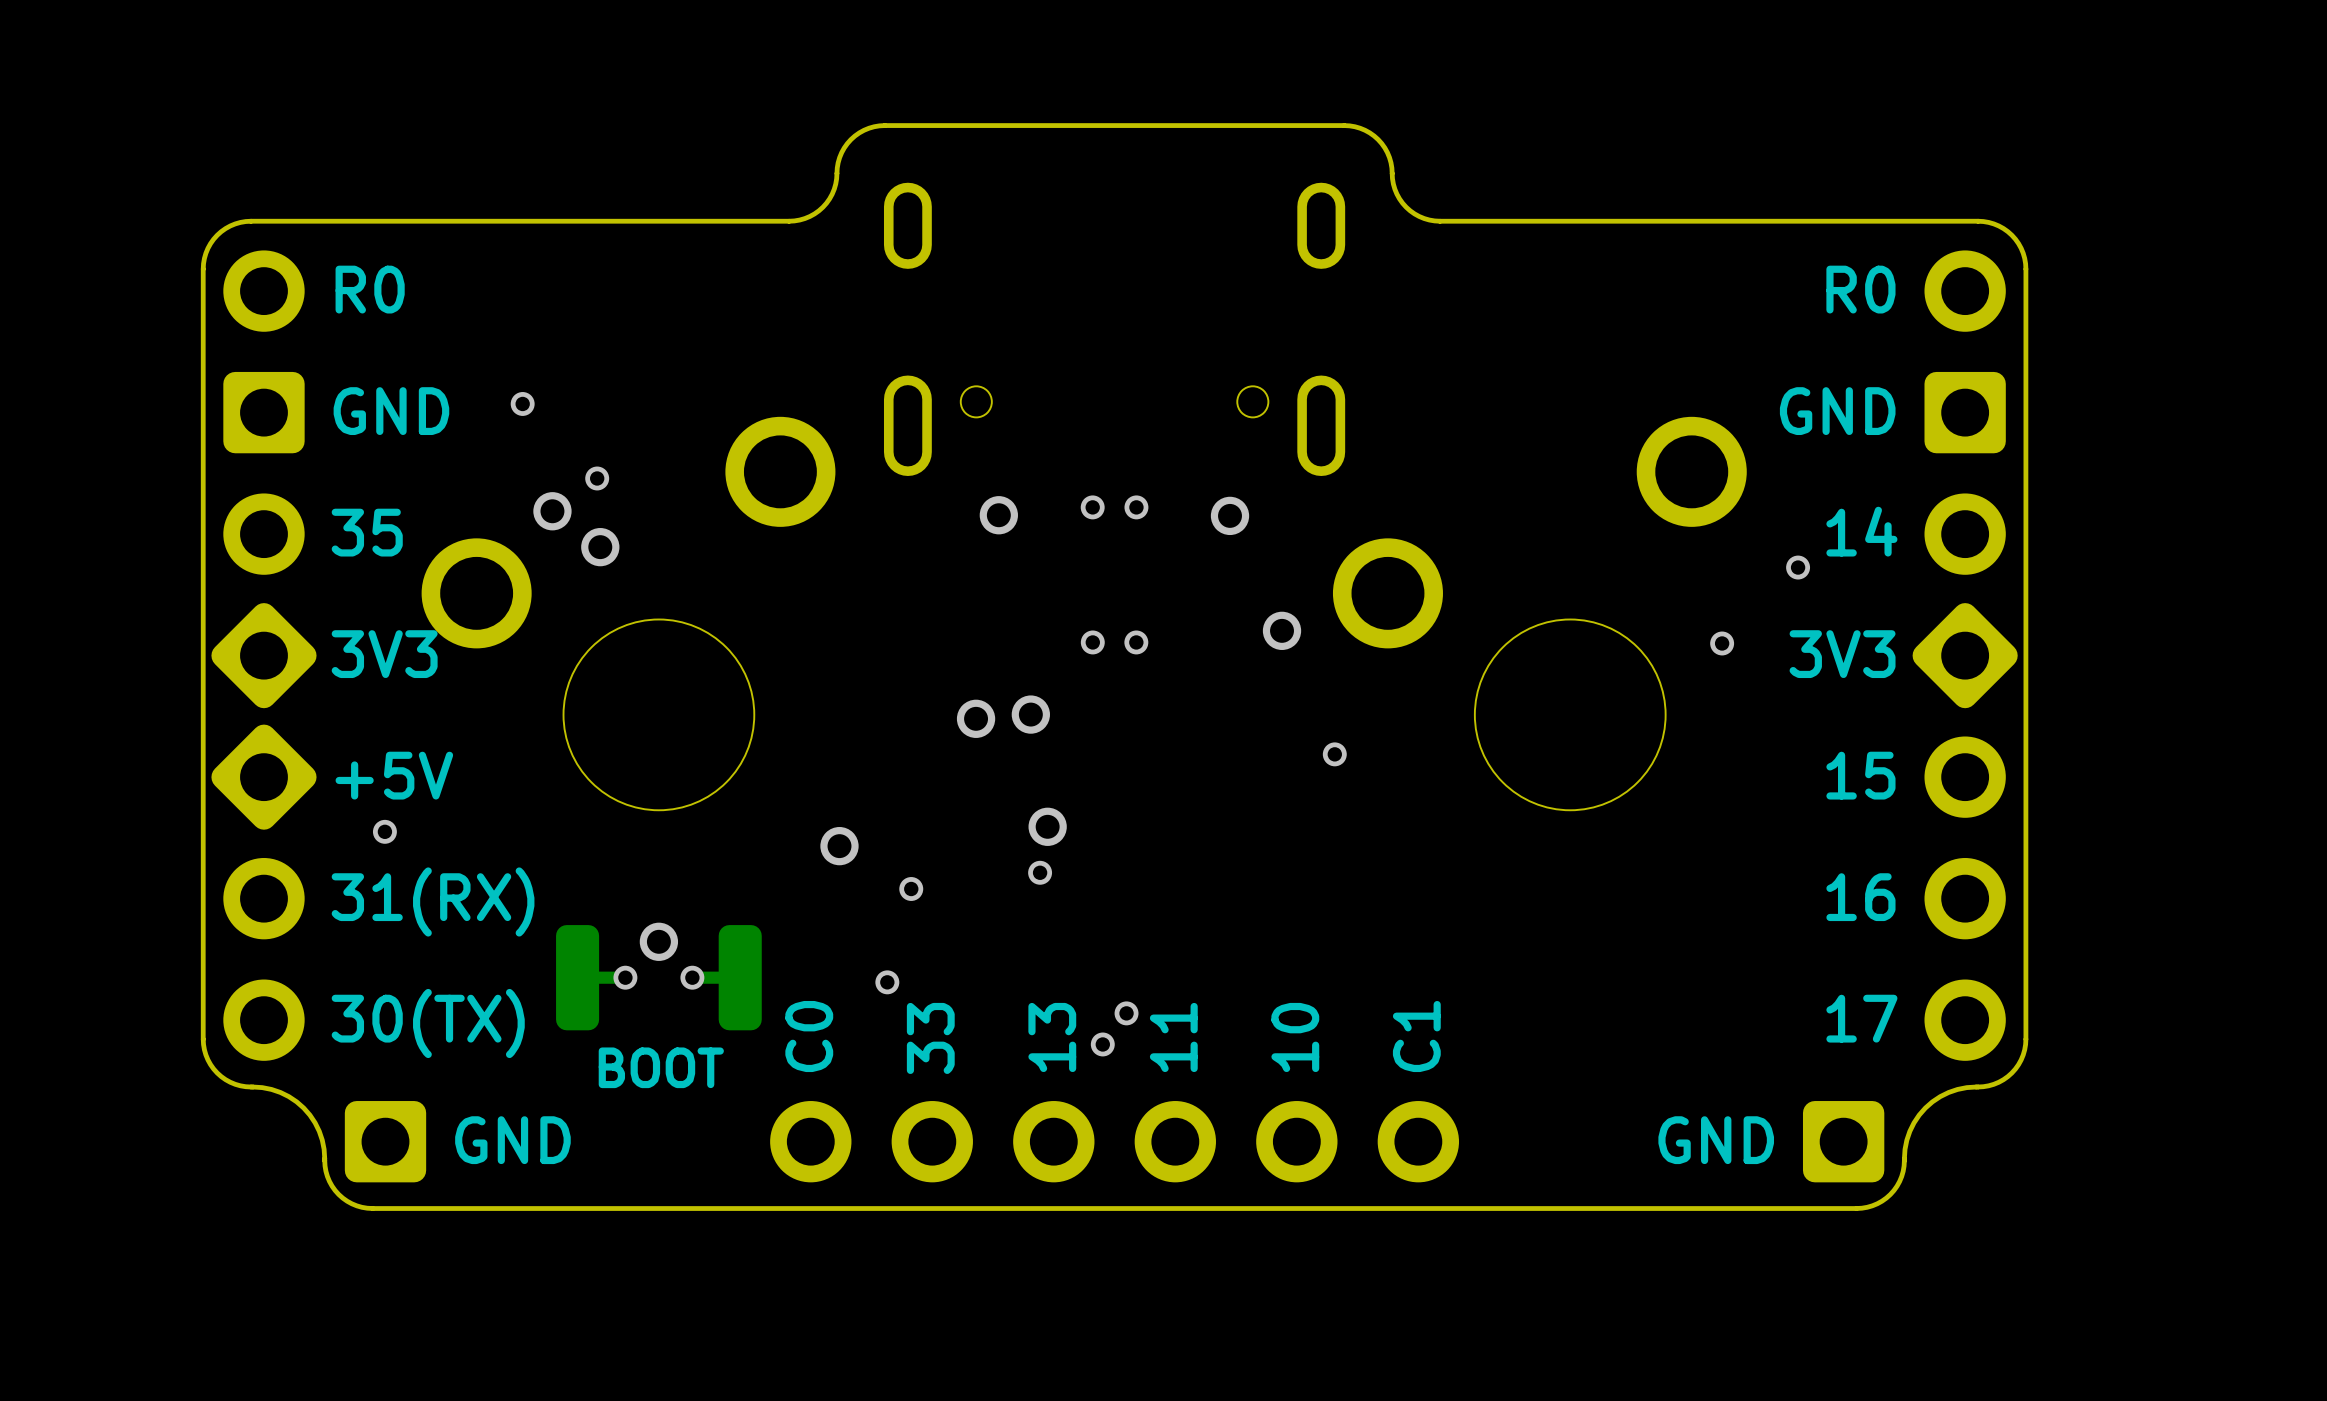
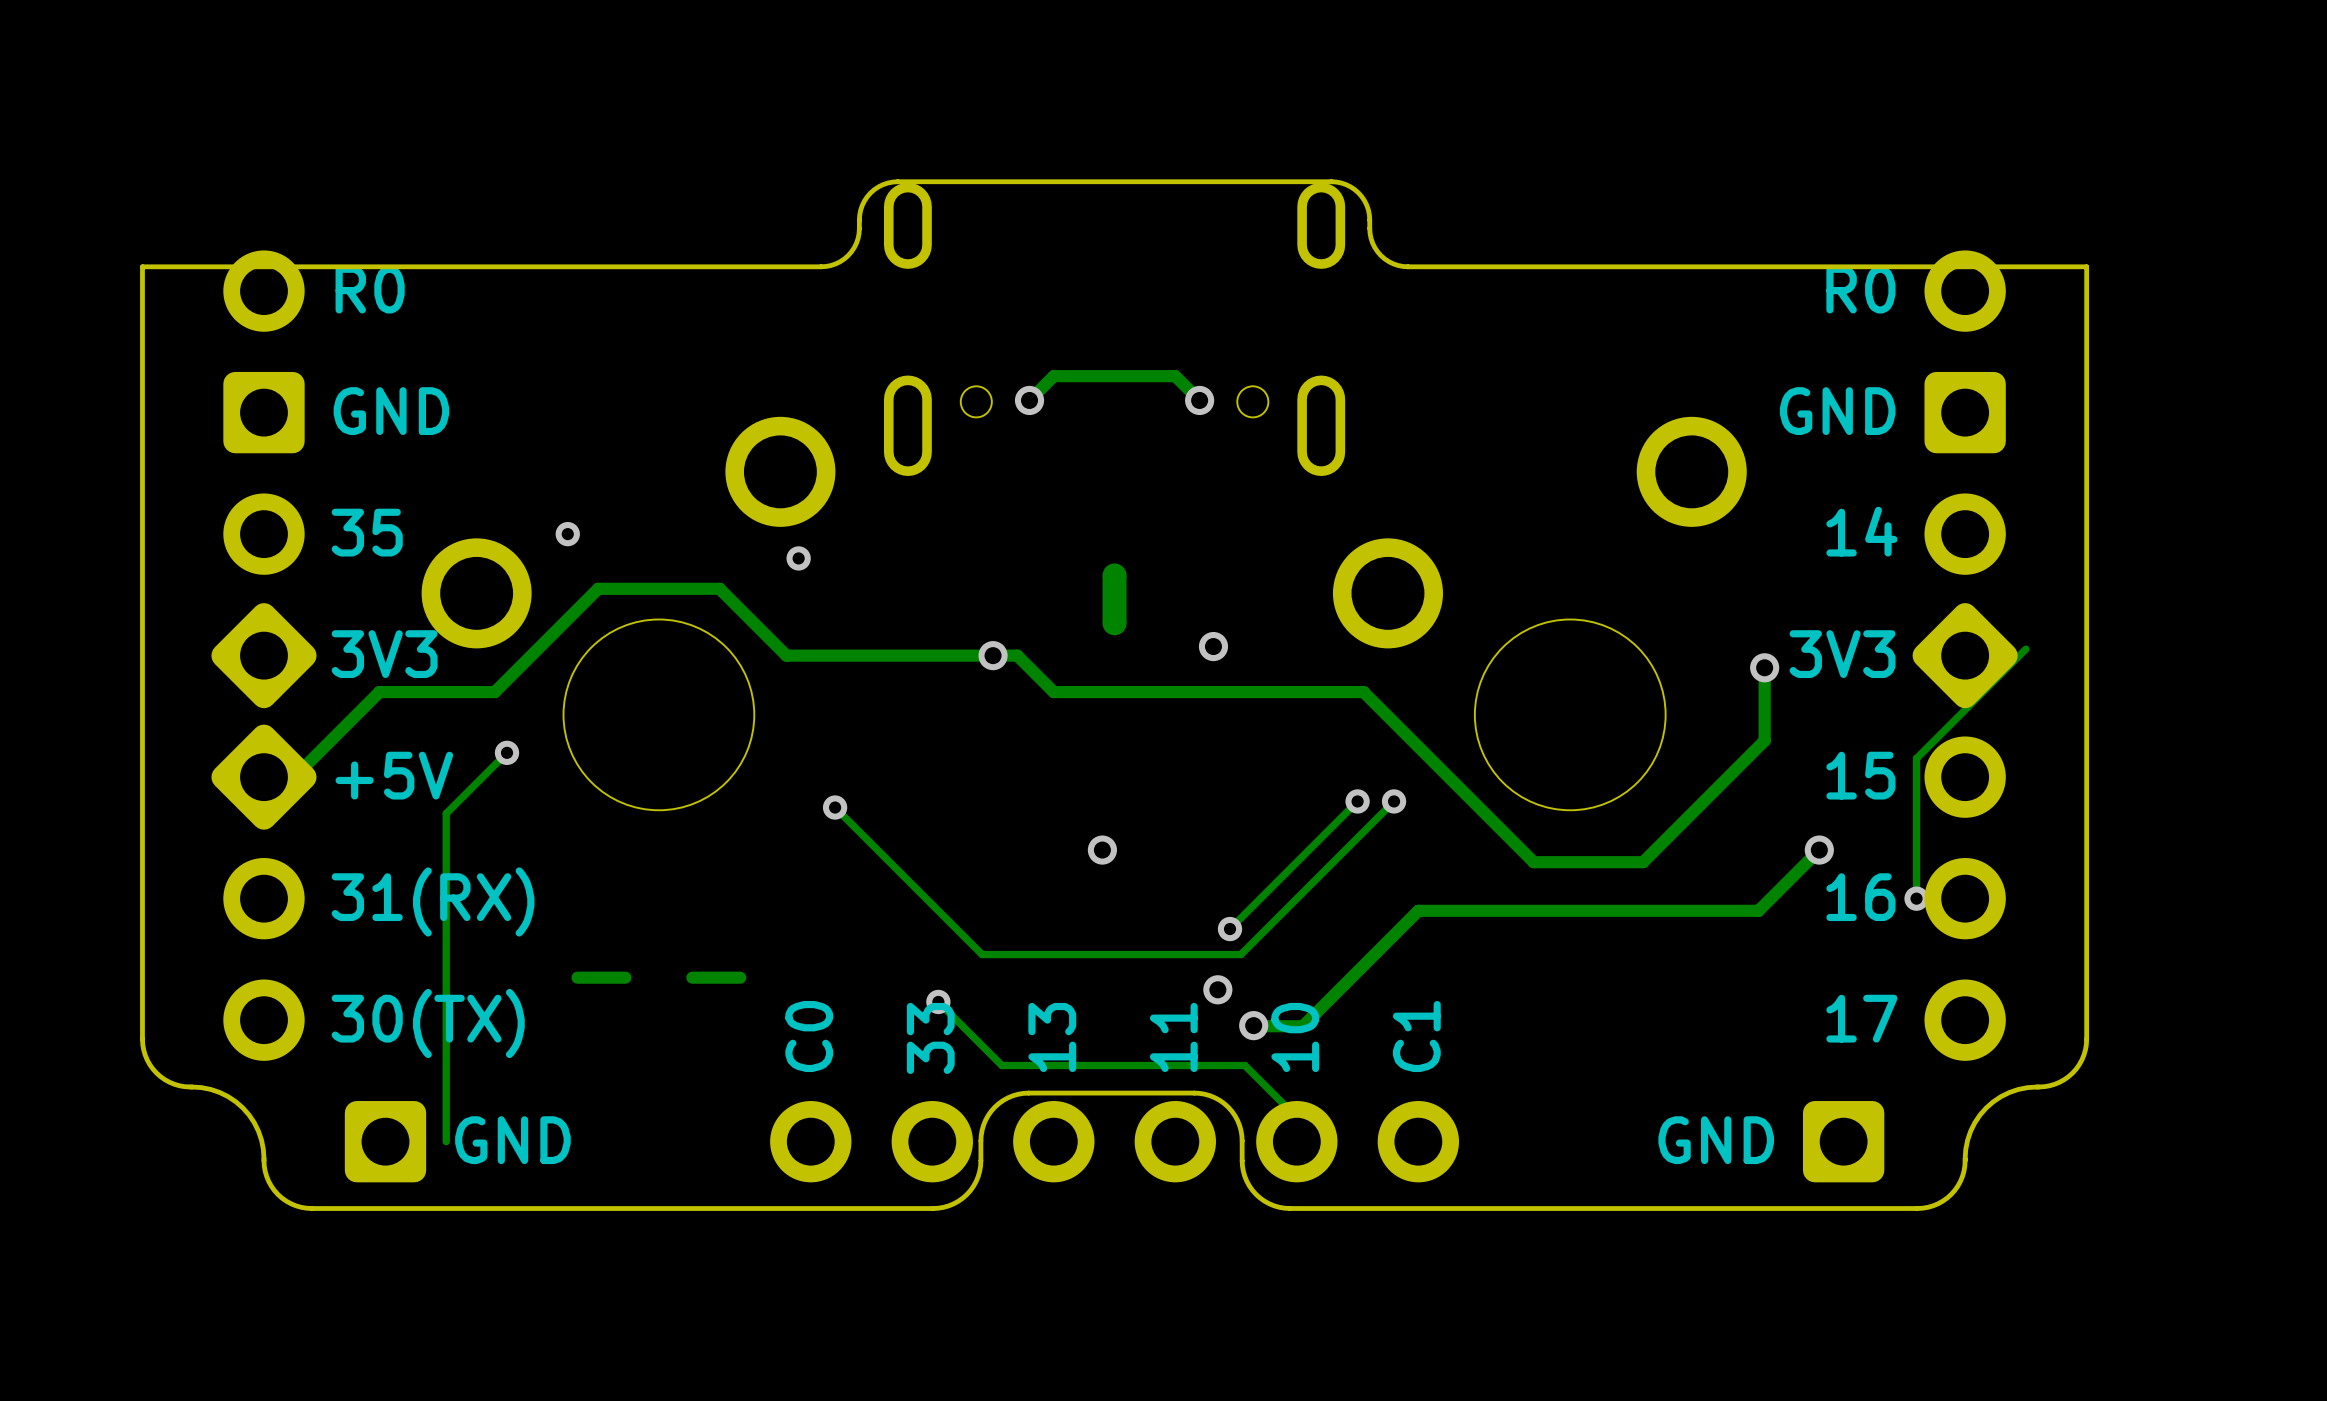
via: none -> (1029, 400)
track: none -> (1199, 400) (1175, 376) (1053, 376) (1029, 400)
via: none -> (1199, 400)
via: (522, 403) -> none
via: (597, 478) -> none
via size: [533, 492, 572, 531] -> [555, 521, 580, 547]
via: (1092, 507) -> none
via: (1136, 507) -> none
via: (998, 515) -> none
via: (1230, 515) -> none
via: (600, 547) -> none
via: none -> (798, 558)
via: (1798, 567) -> none
part: none -> (1114, 599)
via: (1282, 630) -> none
via: (1092, 642) -> none
via: (1136, 642) -> none
via: (1722, 643) -> none
via: none -> (1213, 646)
track: none -> (2025, 649) (1916, 758) (1916, 898)
via: none -> (993, 655)
track: none -> (1764, 667) (1764, 740) (1643, 862) (1533, 862) (1363, 692) (1053, 692) (1017, 655) (786, 655) (719, 588) (598, 588) (494, 692) (379, 692) (294, 777)
via: none -> (1764, 667)
via: (1030, 714) -> none
via: (976, 718) -> none
track: none -> (507, 752) (446, 813) (446, 1141)
via: none -> (507, 752)
via: (1334, 754) -> none
track: none -> (1357, 801) (1230, 929)
via: none -> (1357, 801)
track: none -> (1394, 801) (1240, 954) (982, 954) (835, 807)
via: none -> (1394, 801)
via: none -> (835, 807)
via: (1047, 826) -> none
via: (384, 831) -> none
via: (839, 846) -> none
via: none -> (1102, 850)
track: none -> (1819, 850) (1758, 910) (1418, 910) (1302, 1026) (1254, 1026)
via: none -> (1819, 850)
via: (1040, 872) -> none
via: (911, 888) -> none
via: none -> (1916, 898)
via: none -> (1230, 929)
via: (658, 941) -> none
via: (625, 977) -> none
part: BOOT (658, 977) -> none
via: (692, 977) -> none
via: (887, 982) -> none
via: none -> (1217, 989)
track: none -> (938, 1001) (1001, 1065) (1244, 1065) (1296, 1117) (1296, 1141)
via: none -> (938, 1001)
via: (1126, 1013) -> none
via: none -> (1253, 1025)
via: (1102, 1044) -> none
board edge: (1290, 1208) (933, 1208) -> (1290, 1208) (1274, 1205) (1264, 1201) (1249, 1186) (1242, 1166) (1240, 1130) (1231, 1111) (1215, 1097) (1194, 1093) (1028, 1093) (1007, 1097) (991, 1111) (983, 1125) (981, 1135) (980, 1166) (973, 1186) (962, 1198) (953, 1203) (933, 1208)
board edge: (1856, 1208) (1877, 1203) (1886, 1198) (1897, 1186) (1903, 1171) (1905, 1149) (1909, 1131) (1925, 1108) (1948, 1092) (1966, 1087) (1988, 1085) (2003, 1079) (2015, 1068) (2024, 1049) (2025, 269) (2021, 248) (2015, 239) (2003, 228) (1988, 222) (1978, 221) (1429, 220) (1410, 210) (1399, 198) (1393, 184) (1389, 157) (1378, 139) (1360, 128) (1344, 125) (879, 125) (864, 130) (850, 139) (839, 157) (835, 184) (829, 198) (814, 213) (794, 220) (251, 221) (235, 223) (217, 235) (207, 248) (203, 269) (203, 1044) (210, 1064) (225, 1079) (240, 1085) (262, 1087) (280, 1092) (303, 1108) (319, 1131) (324, 1149) (325, 1171) (332, 1186) (342, 1198) (351, 1203) (372, 1208) -> (1856, 1208) (1922, 1208) (1942, 1201) (1951, 1194) (1960, 1181) (1970, 1131) (1986, 1108) (2009, 1092) (2027, 1087) (2049, 1085) (2064, 1079) (2079, 1064) (2085, 1049) (2086, 266) (1403, 266) (1388, 261) (1374, 247) (1370, 233) (1368, 210) (1361, 196) (1346, 184) (1331, 181) (892, 182) (874, 189) (864, 200) (859, 215) (858, 238) (851, 251) (840, 261) (826, 266) (142, 266) (143, 1049) (149, 1064) (164, 1079) (179, 1085) (201, 1087) (219, 1092) (242, 1108) (258, 1131) (268, 1181) (274, 1190) (286, 1201) (306, 1208) (372, 1208)

